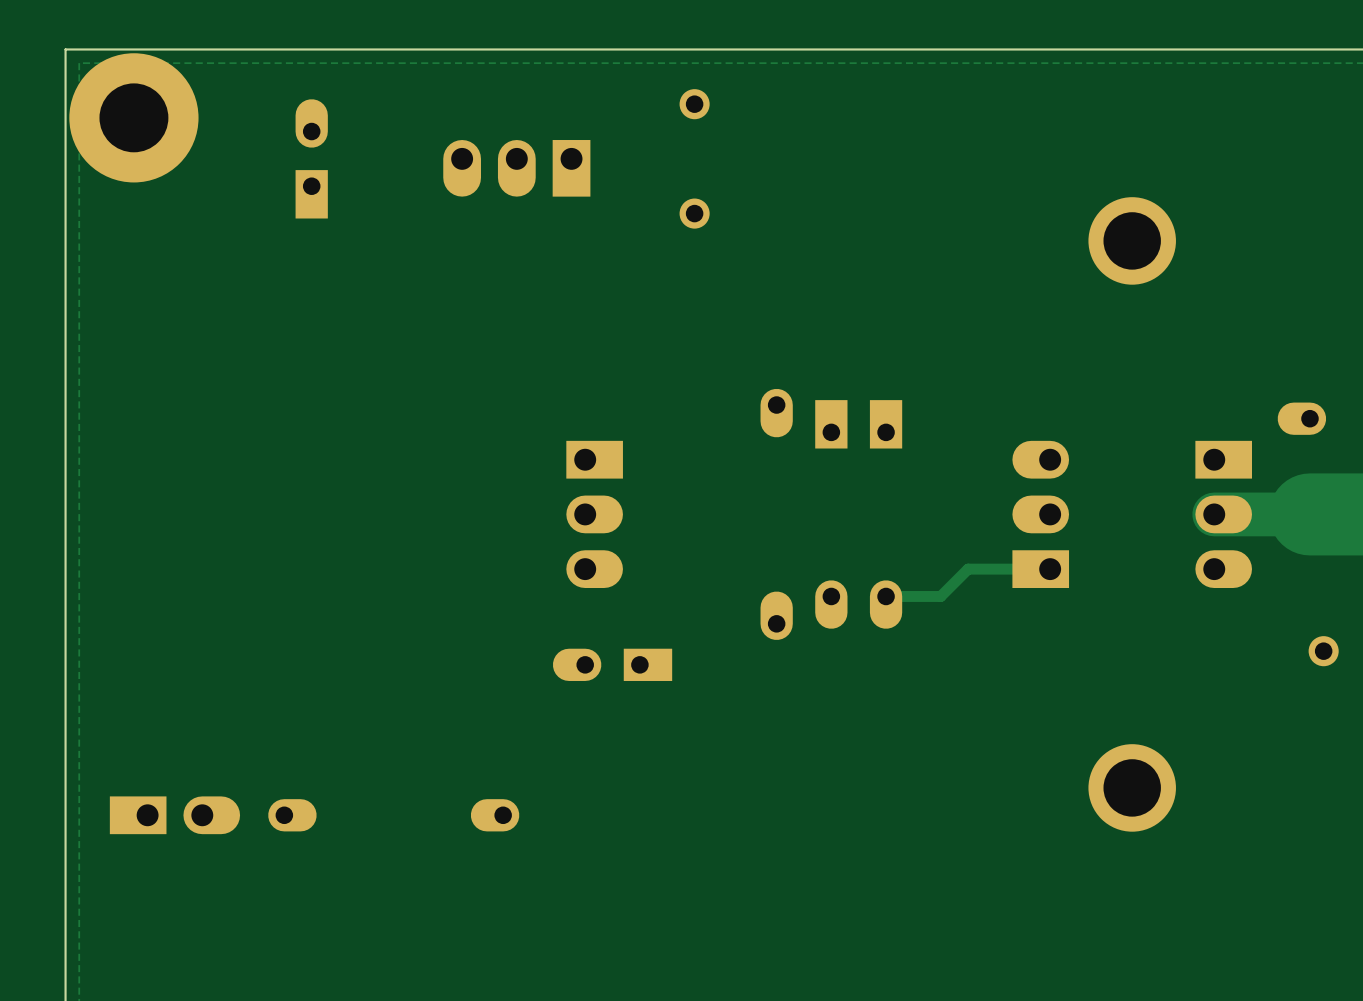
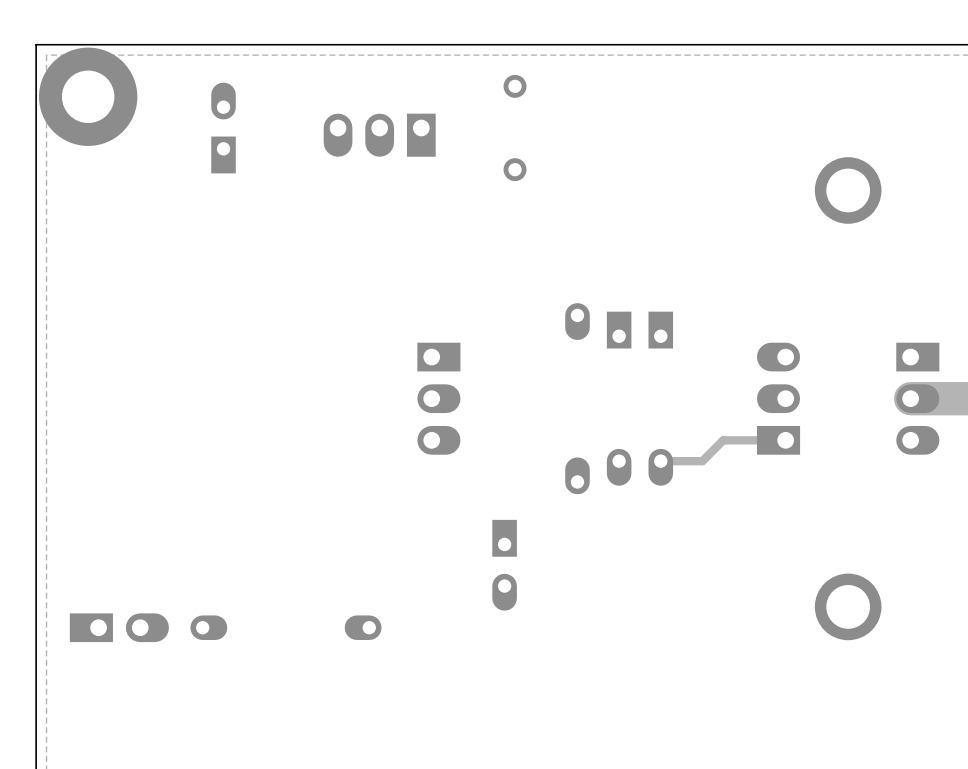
part rotation: 0° (612, 664) -> 90° counterclockwise (504, 565)
part position: (612, 664) -> (504, 565)

